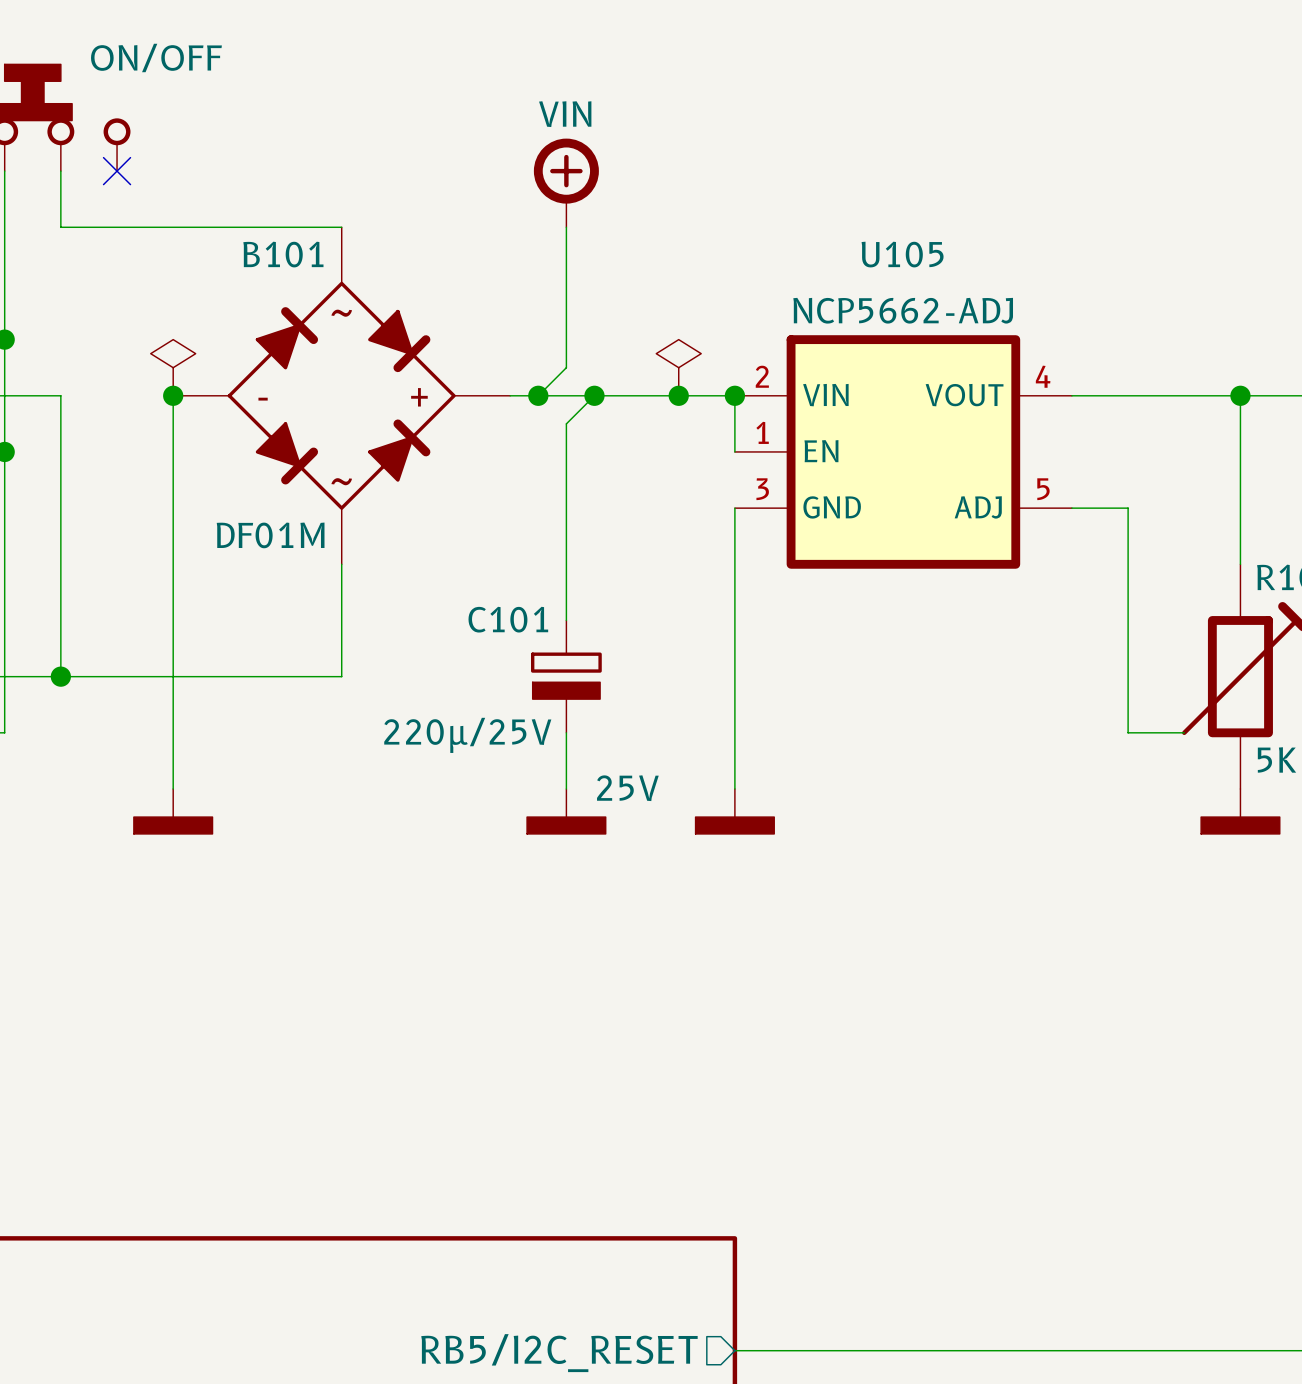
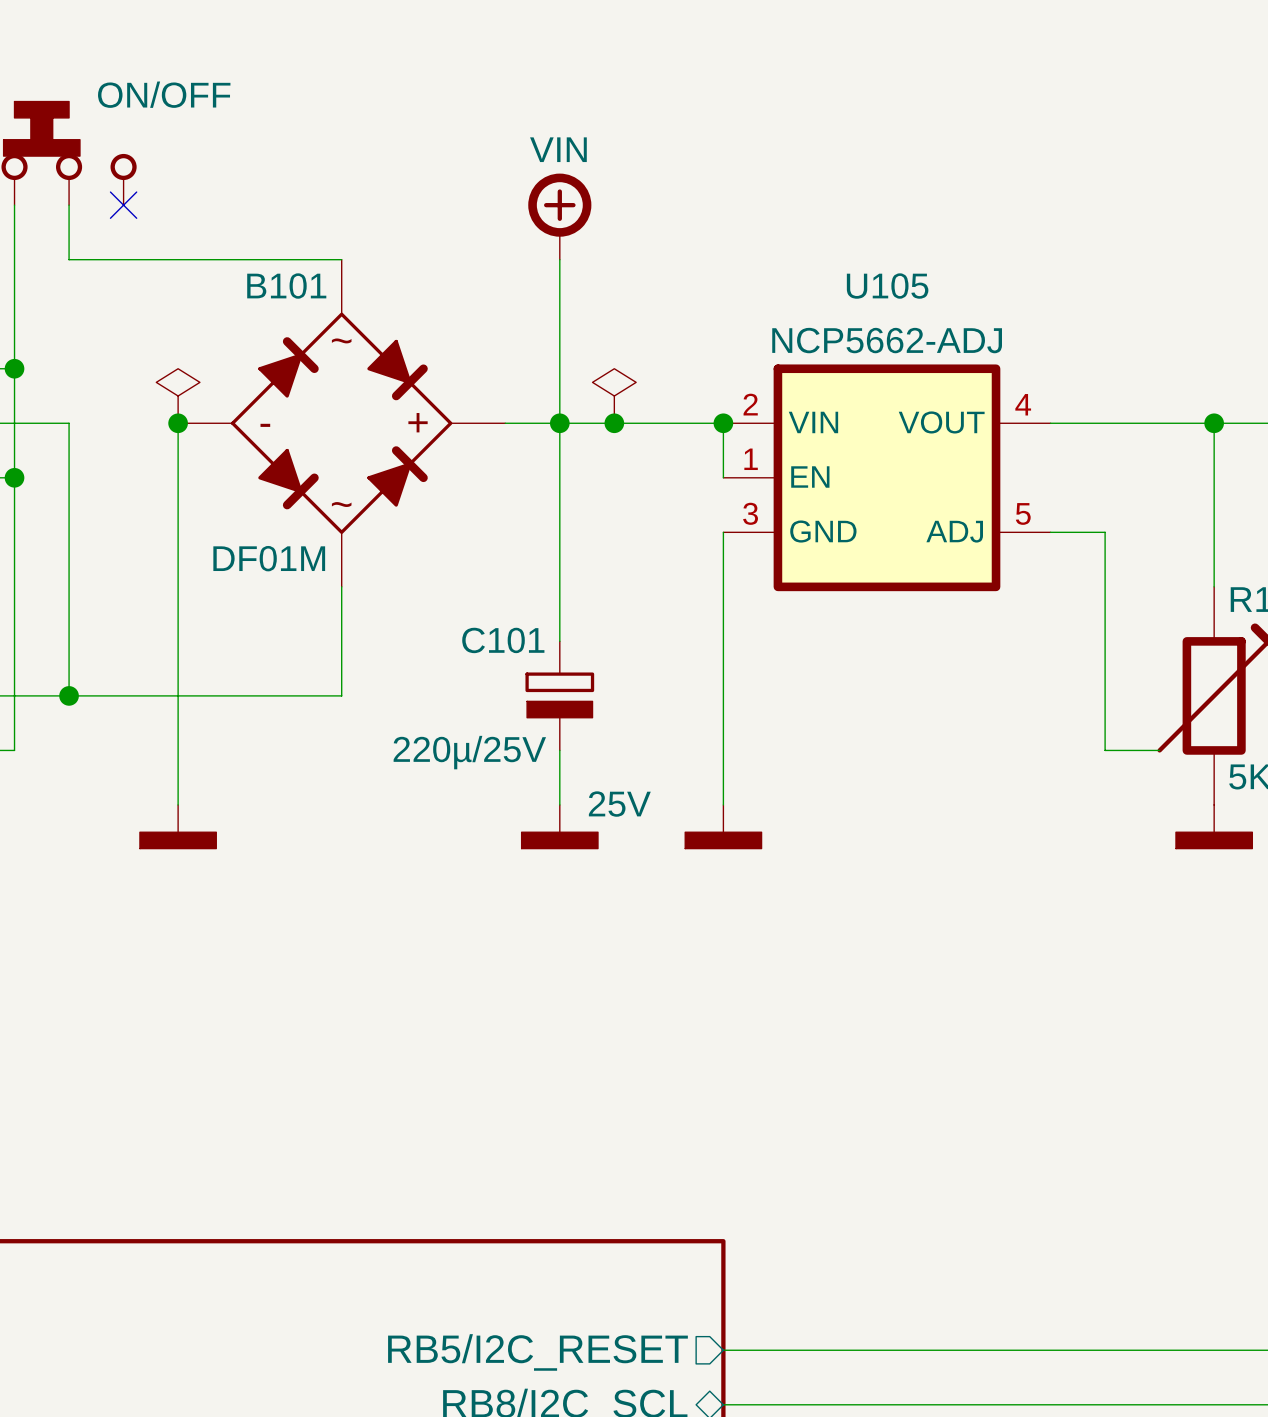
wire: (566, 367) (538, 395) -> (559, 396) (559, 450)
power symbol position: (678, 367) -> (614, 396)
junction: (538, 395) -> none
junction: none -> (559, 423)
wire: (594, 395) (566, 423) -> none
junction: (594, 395) -> none
junction: none -> (614, 423)
junction: (678, 395) -> none

